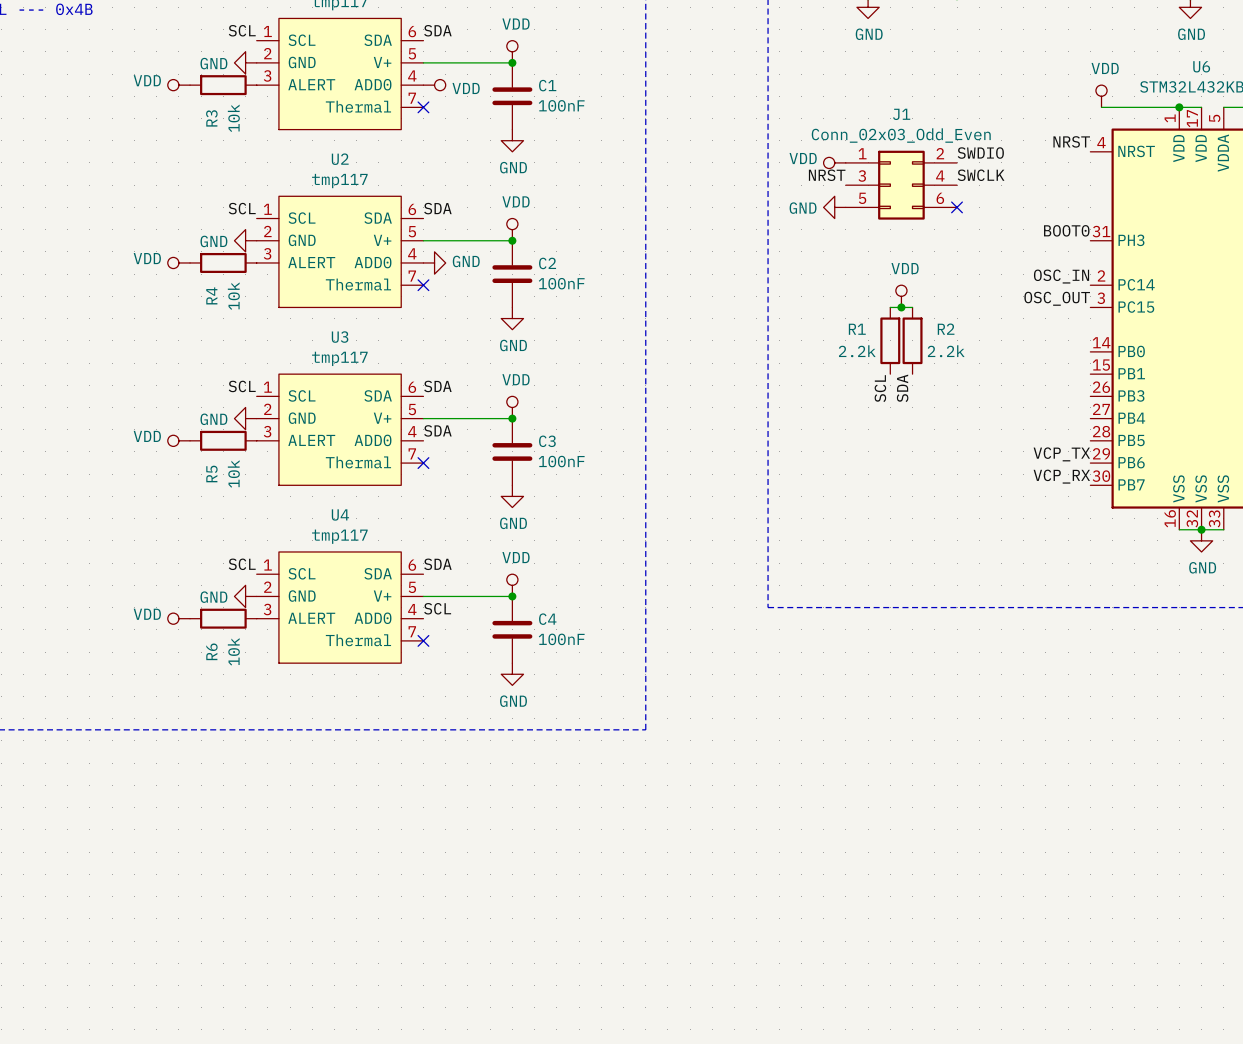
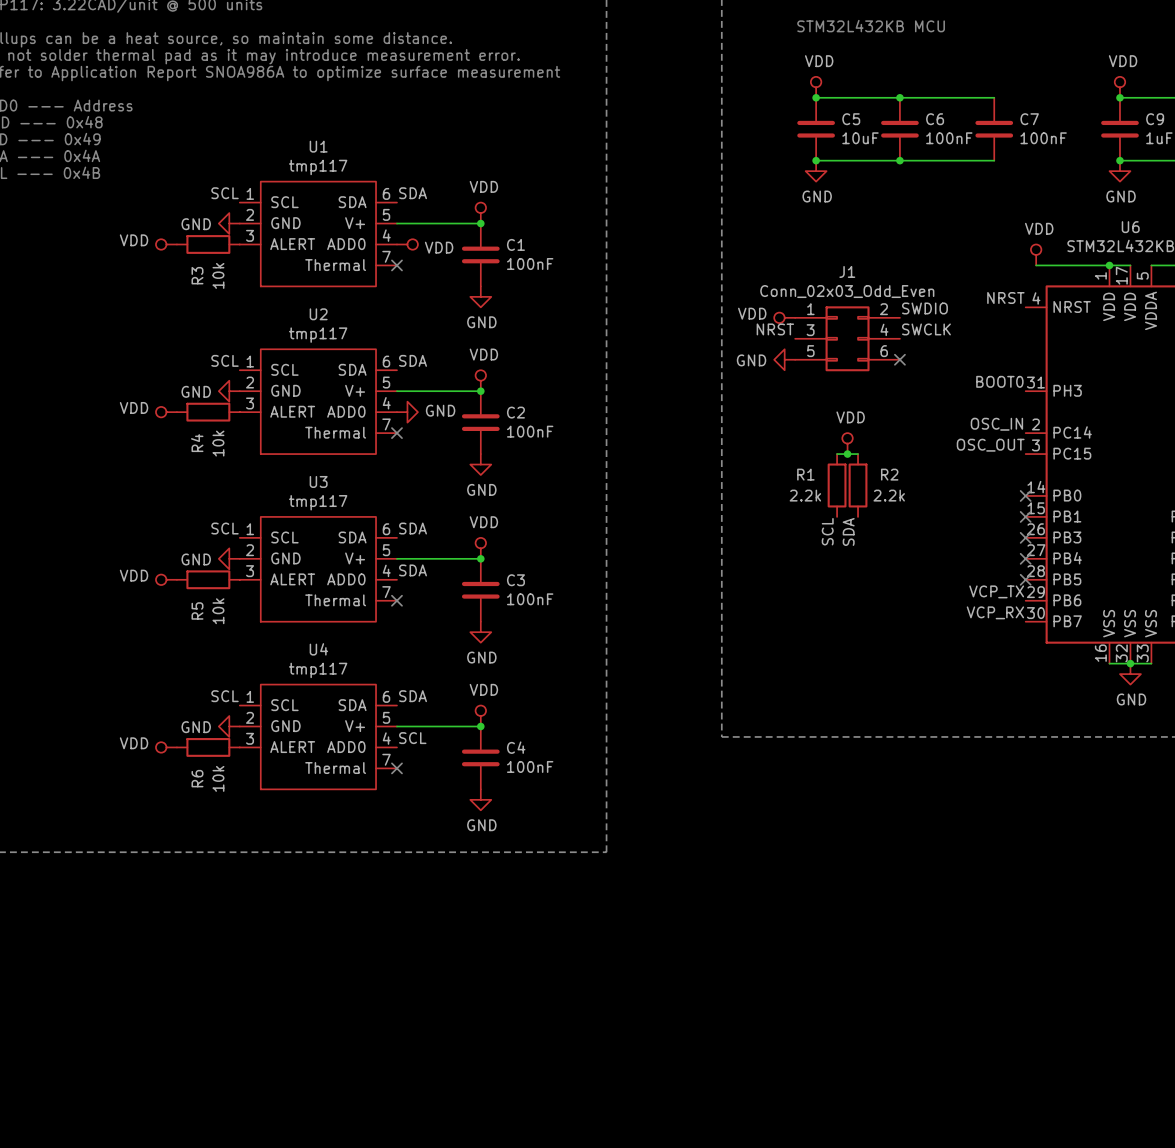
no-connect mark: none -> (1025, 495)
no-connect mark: none -> (1025, 516)
no-connect mark: none -> (1025, 537)
no-connect mark: none -> (1025, 558)
no-connect mark: none -> (1025, 579)

